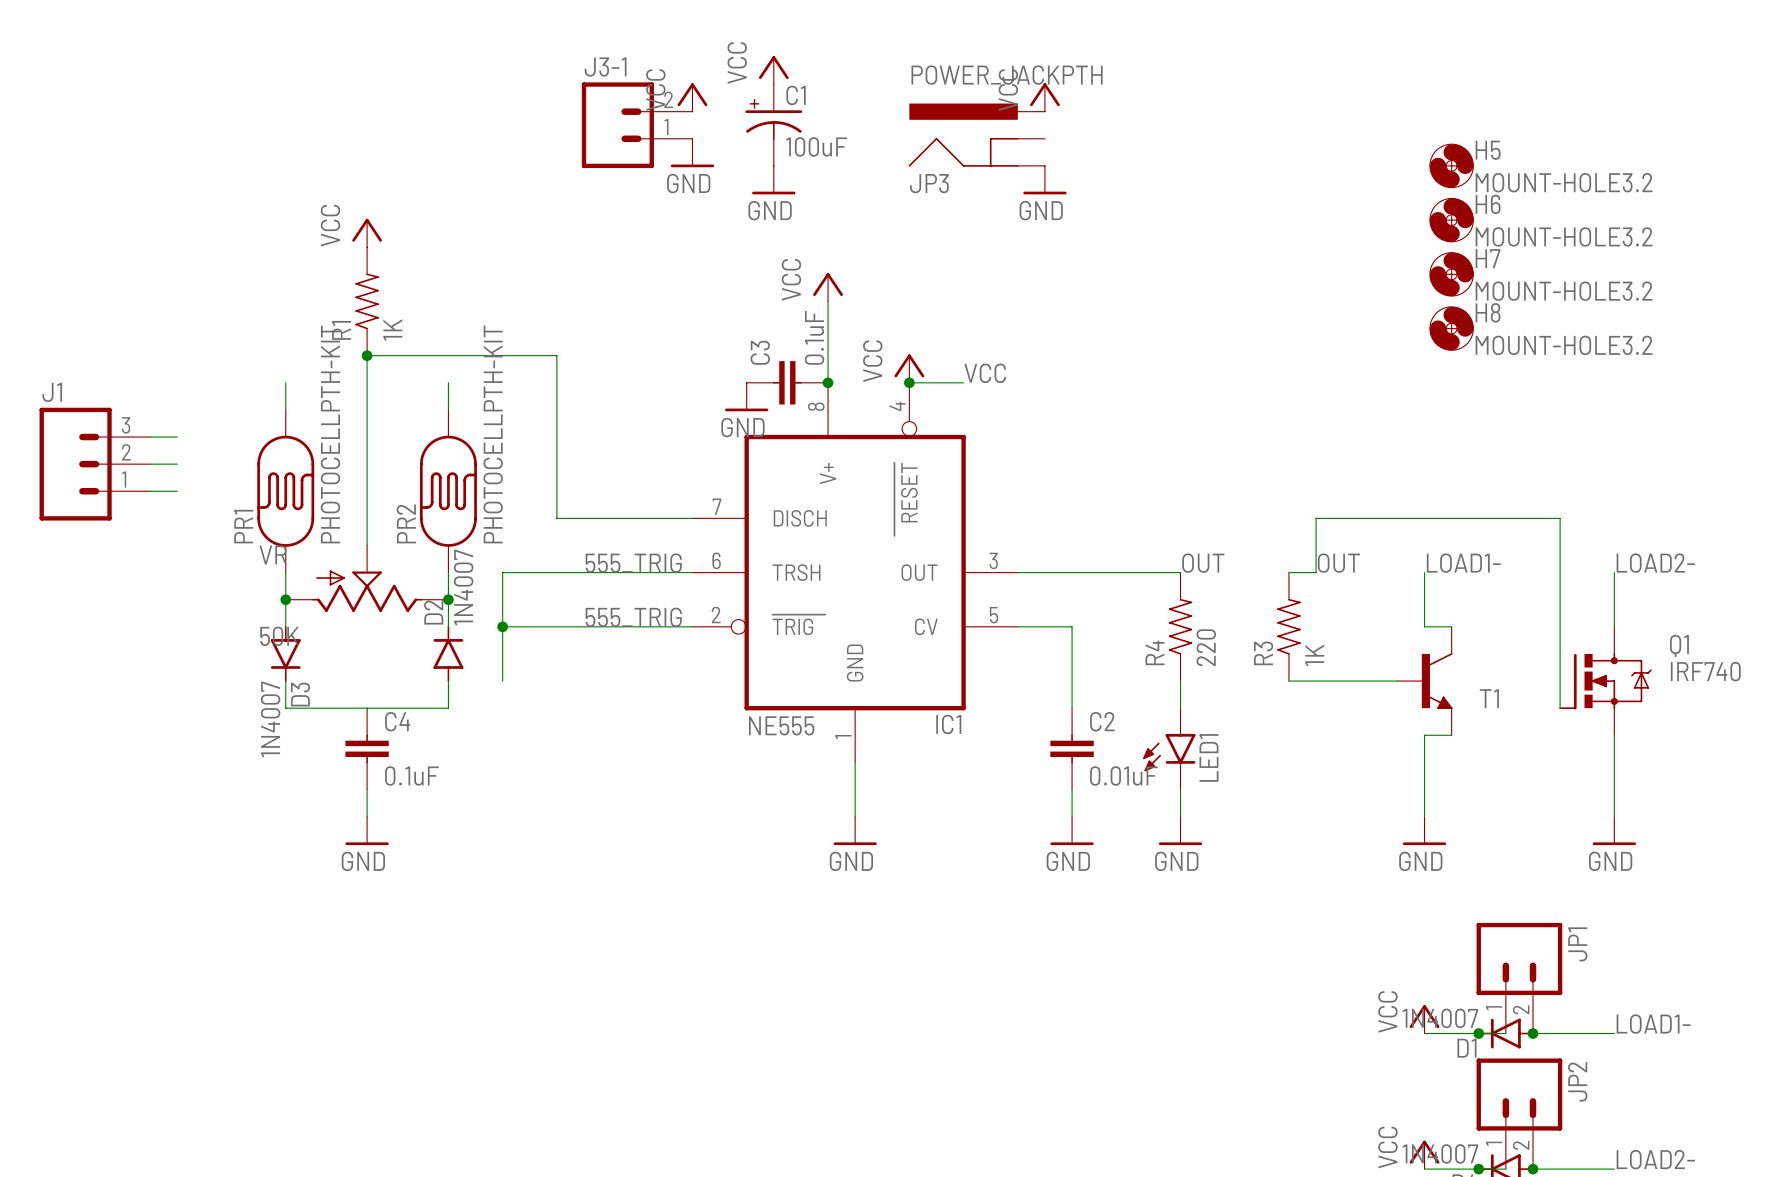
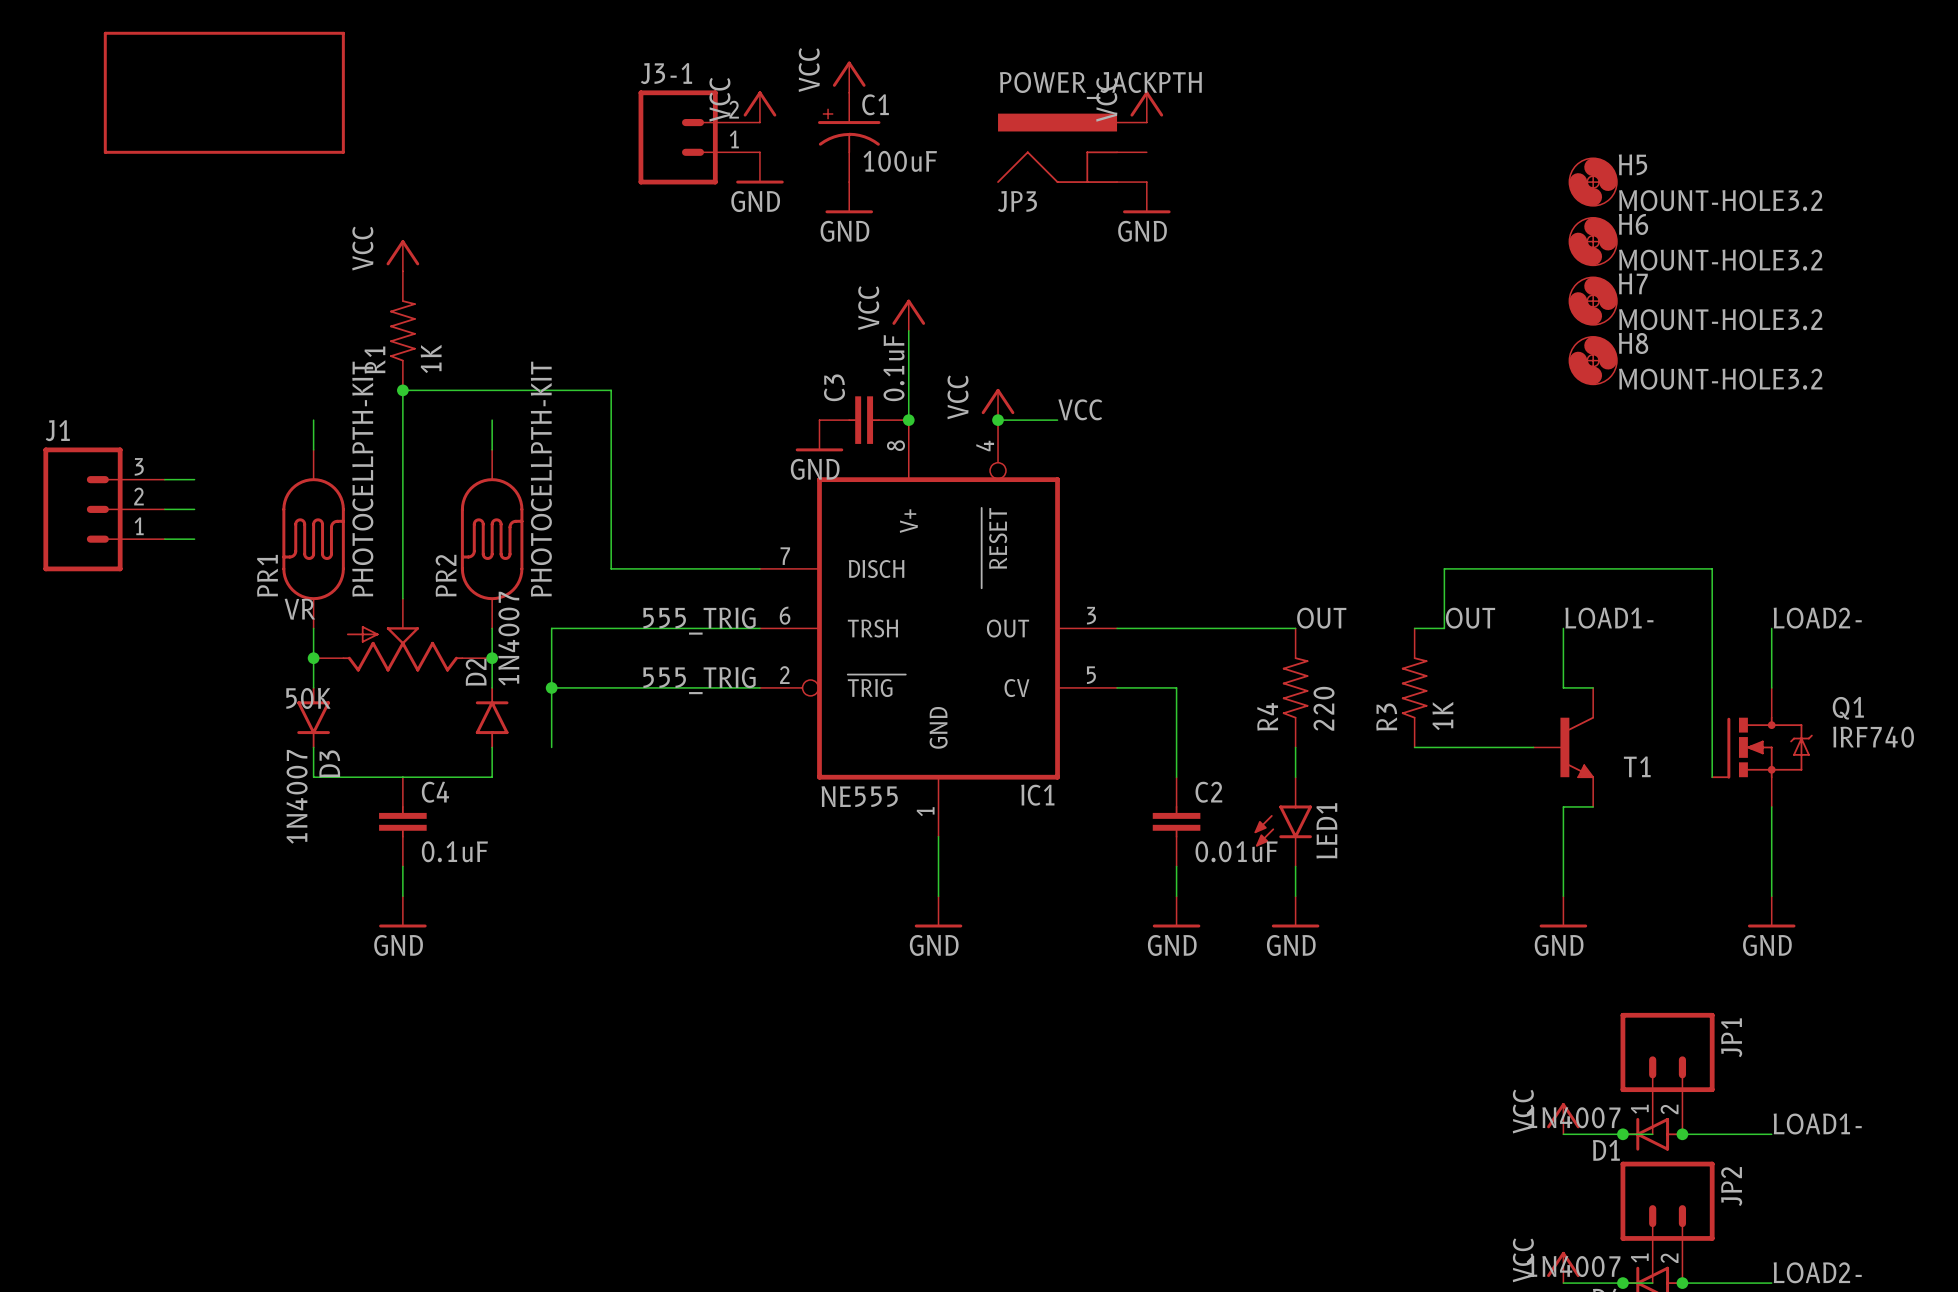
part: none -> (224, 92)

